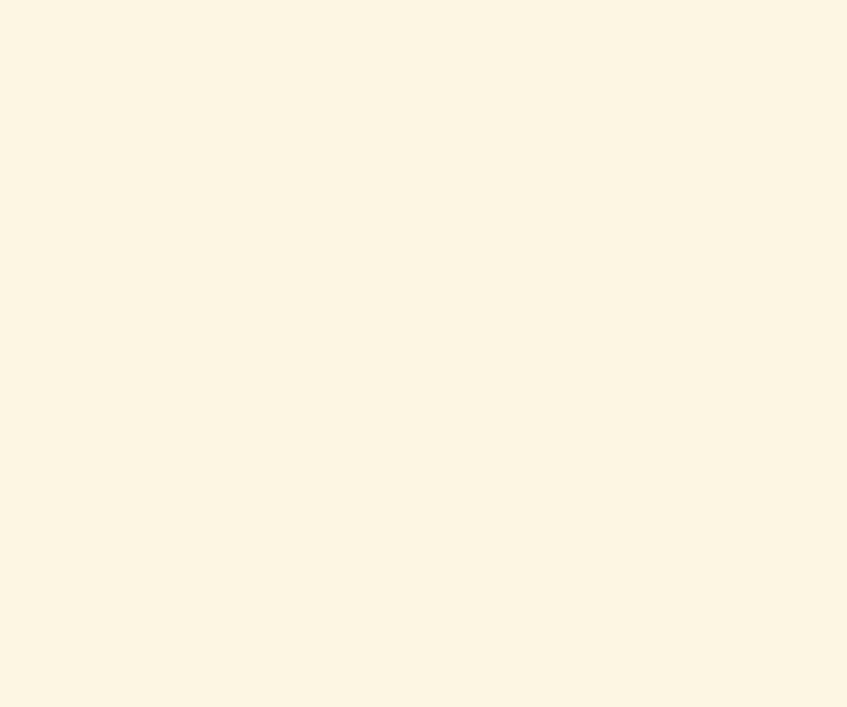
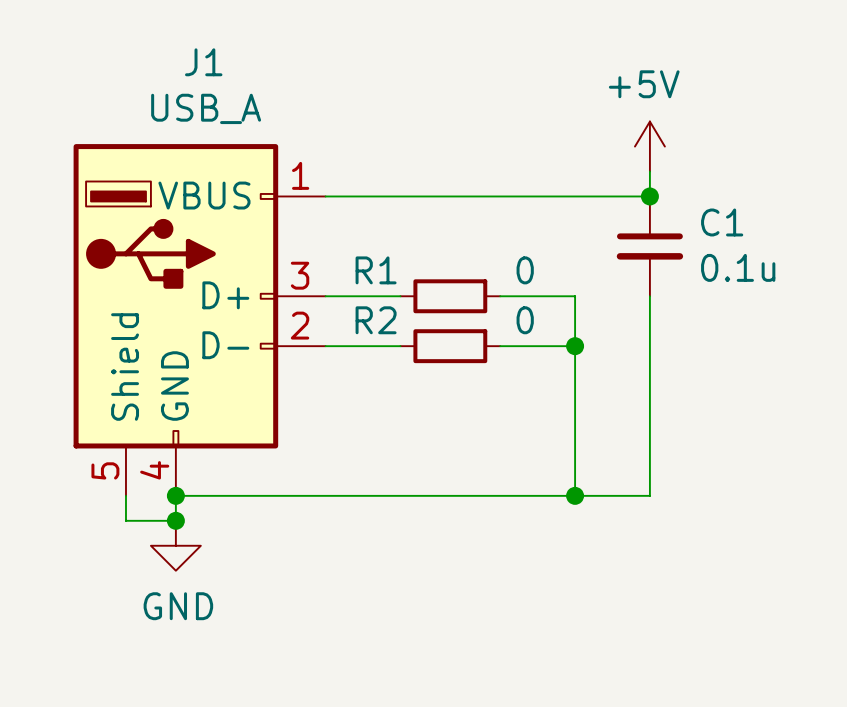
power symbol: none -> +5V (649, 146)
wire: none -> (649, 171) (649, 196) (325, 196)
junction: none -> (649, 196)
C1: none -> 0.1u (649, 246)
wire: none -> (325, 296) (400, 296)
R1: none -> 0 (450, 296)
wire: none -> (500, 296) (575, 296) (575, 495)
wire: none -> (649, 296) (649, 495) (175, 495) (175, 520) (125, 520) (125, 495)
J1: none -> USB_A (199, 319)
wire: none -> (325, 346) (400, 346)
R2: none -> 0 (450, 346)
wire: none -> (500, 346) (575, 346)
junction: none -> (575, 346)
junction: none -> (175, 495)
junction: none -> (575, 495)
junction: none -> (175, 520)
power symbol: none -> GND (175, 545)

